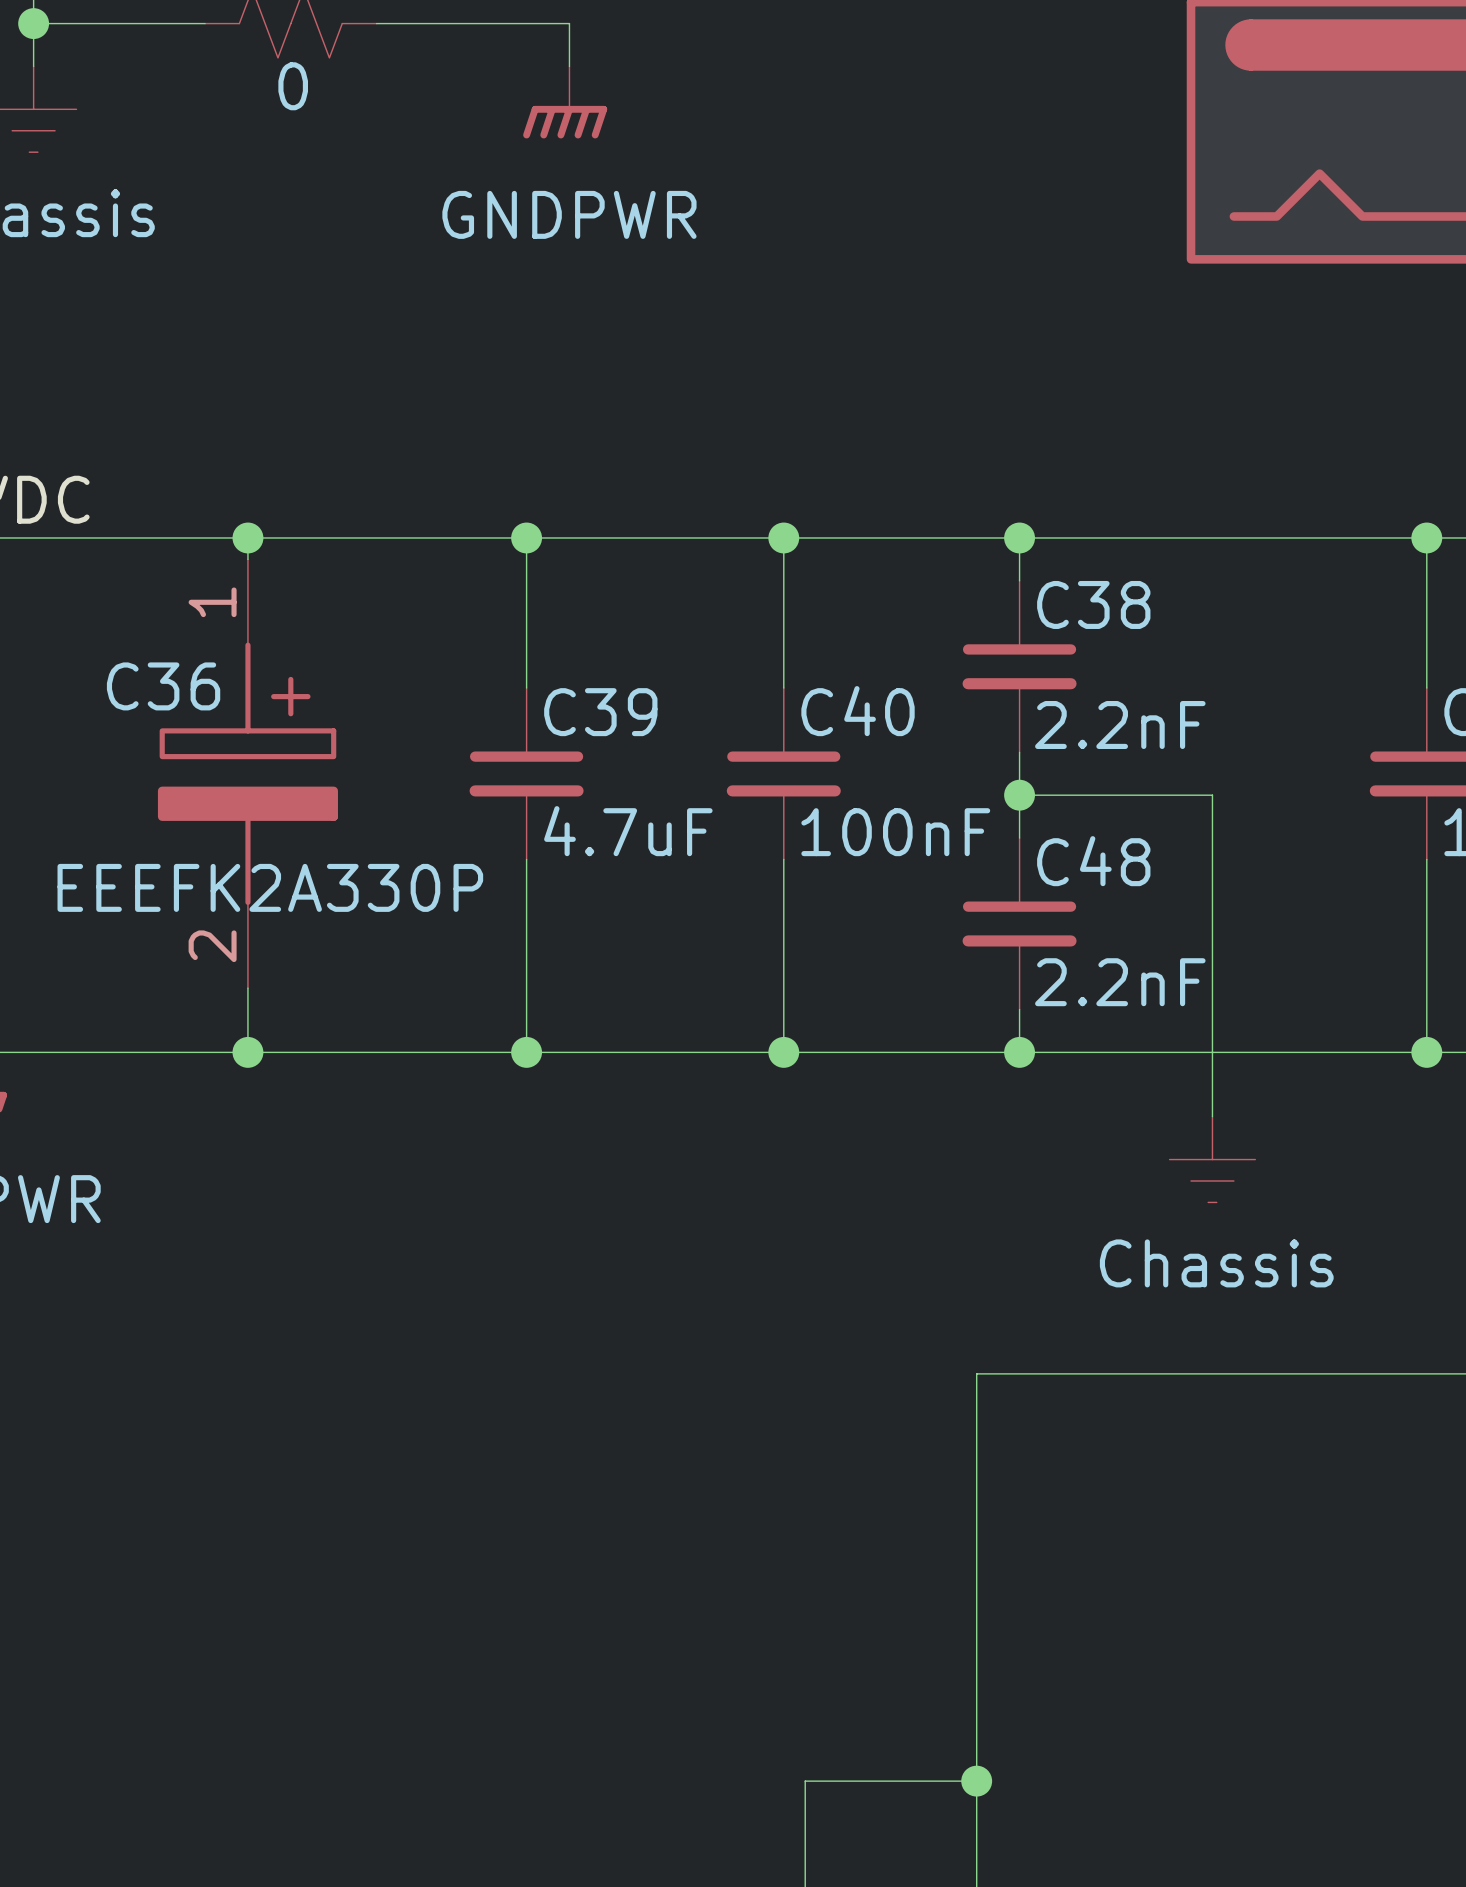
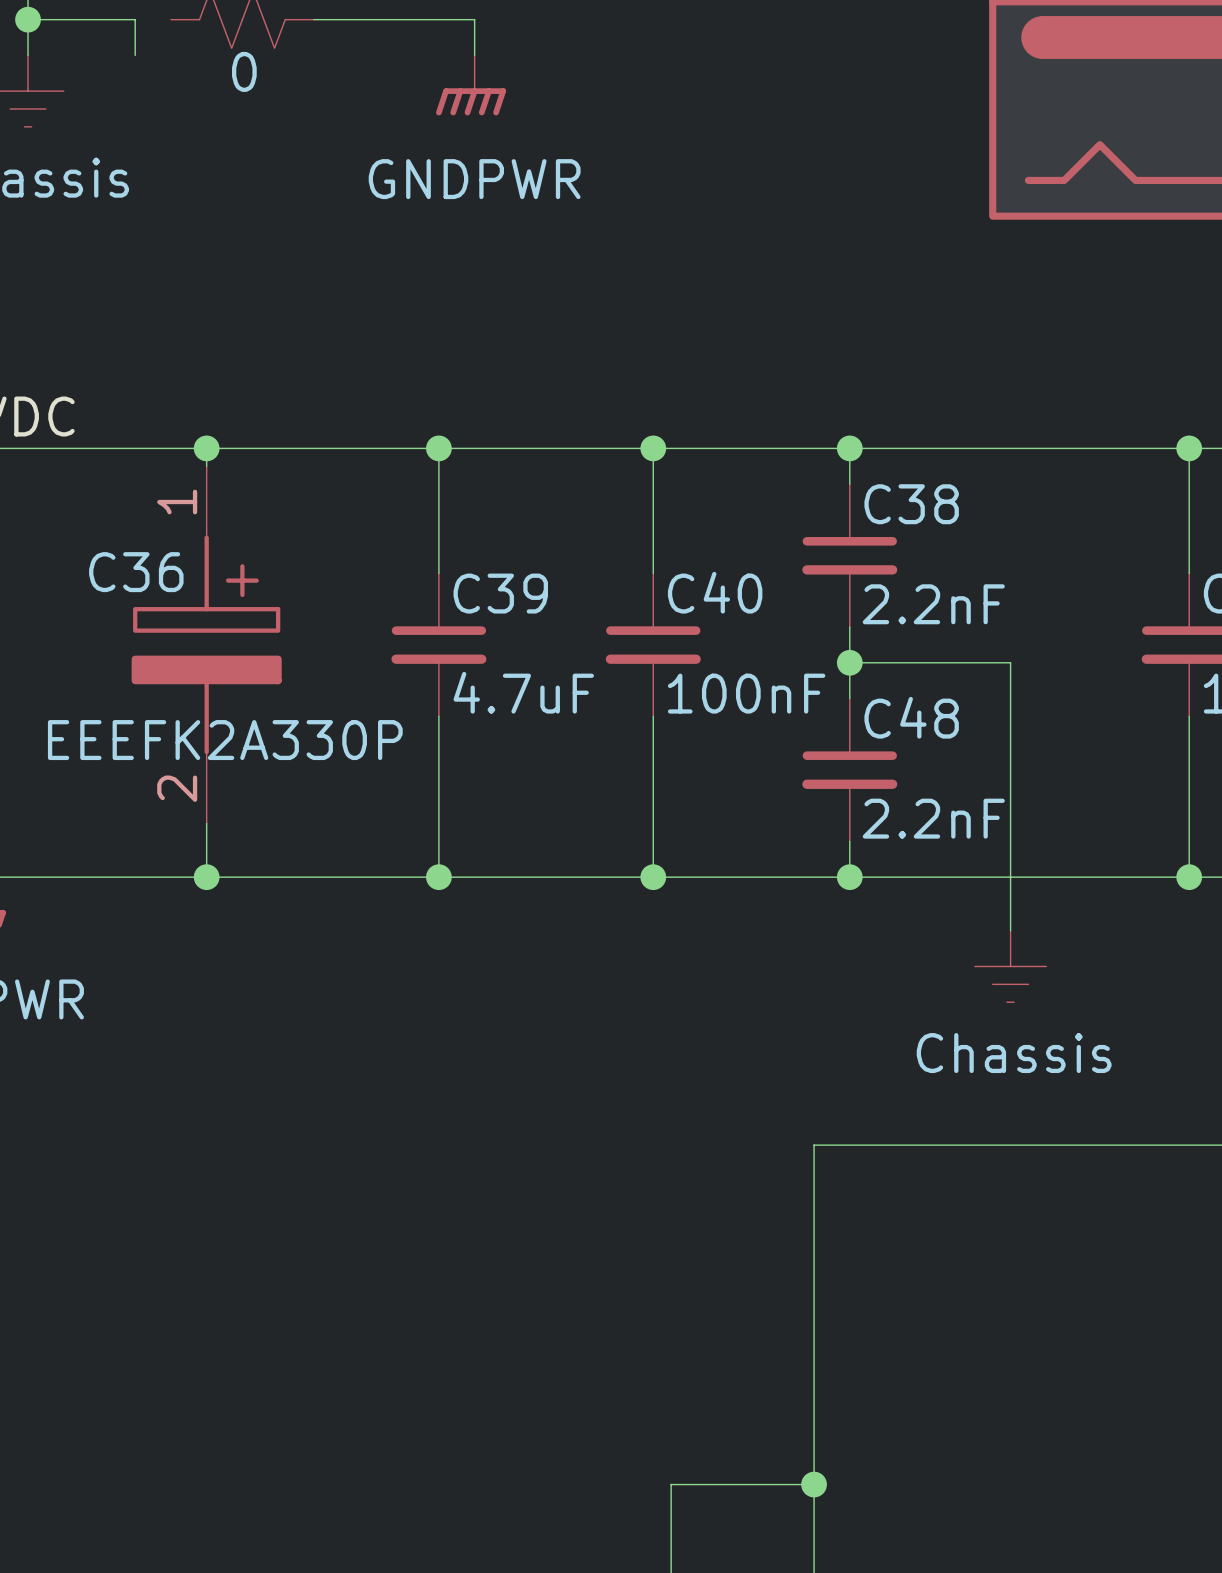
wire: (162, 23) (205, 23) -> (135, 19) (135, 55)

